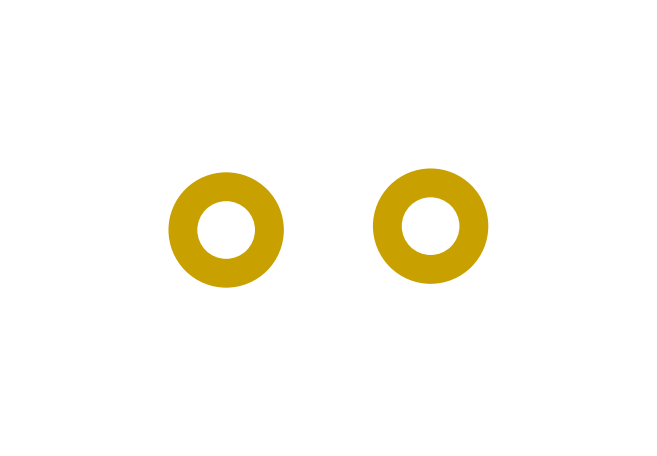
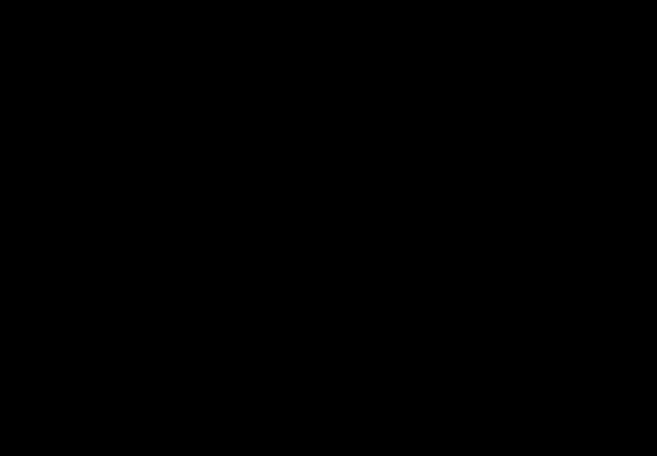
part: (430, 226) -> none
part: (226, 230) -> none

